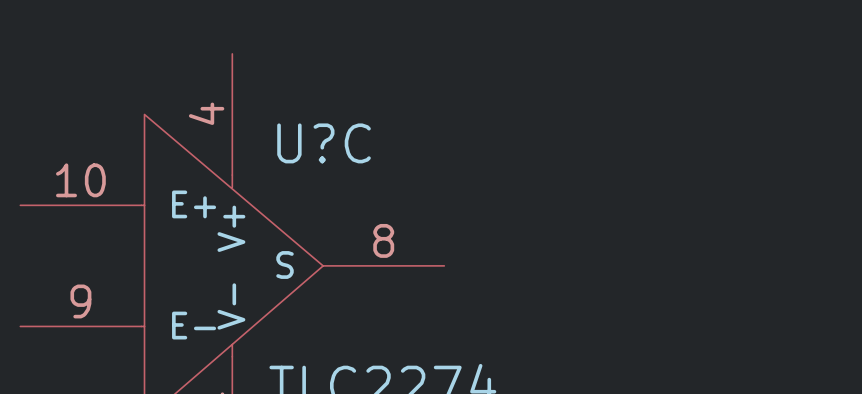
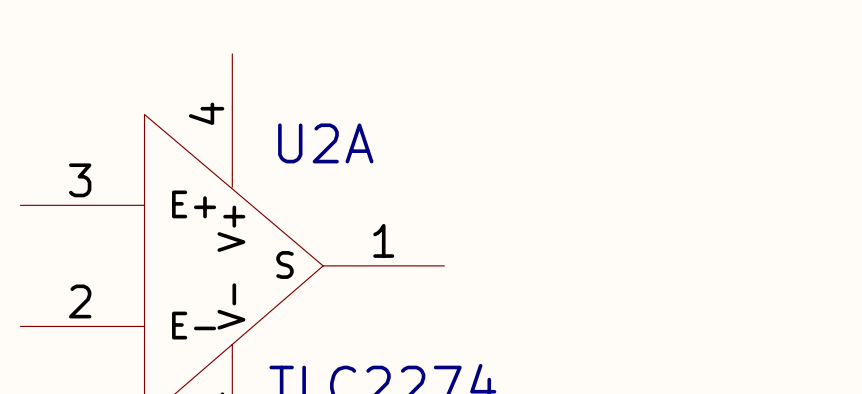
U?C name: U?C (324, 143) -> U2A (325, 143)
U?C pin number: 10 (80, 180) -> 3 (80, 180)
U?C pin number: 8 (383, 240) -> 1 (383, 240)
U?C pin number: 9 (80, 301) -> 2 (80, 301)

